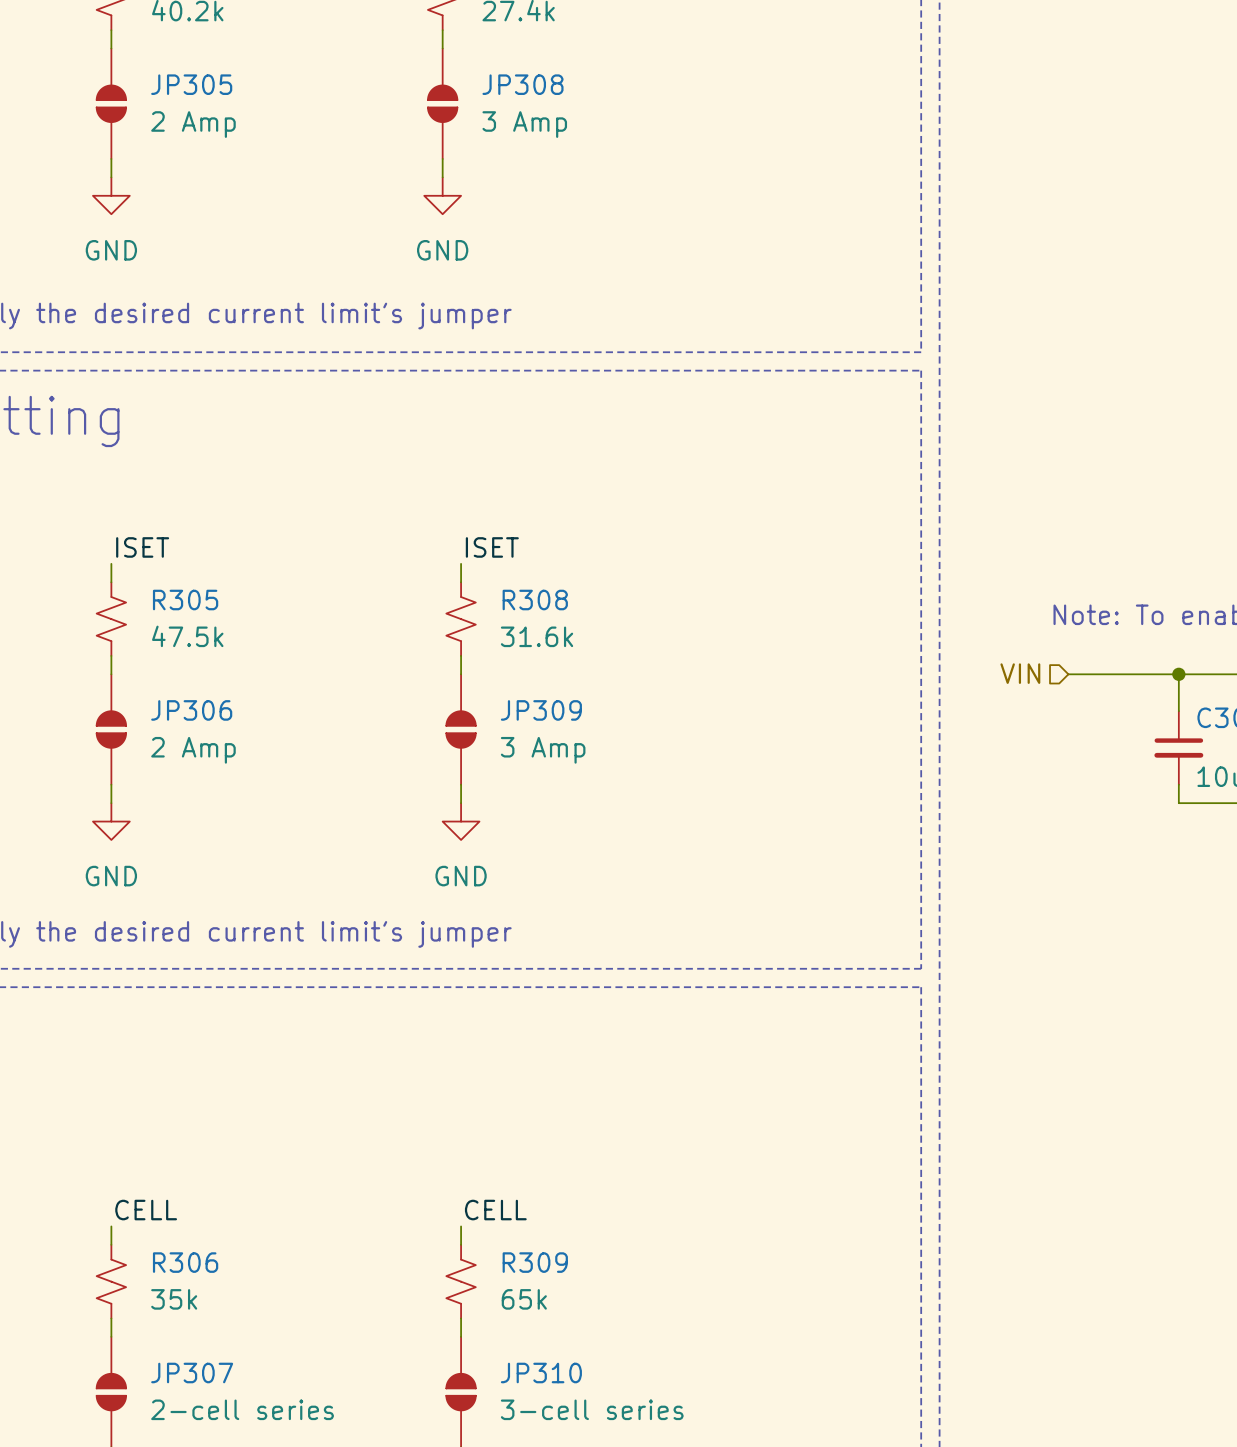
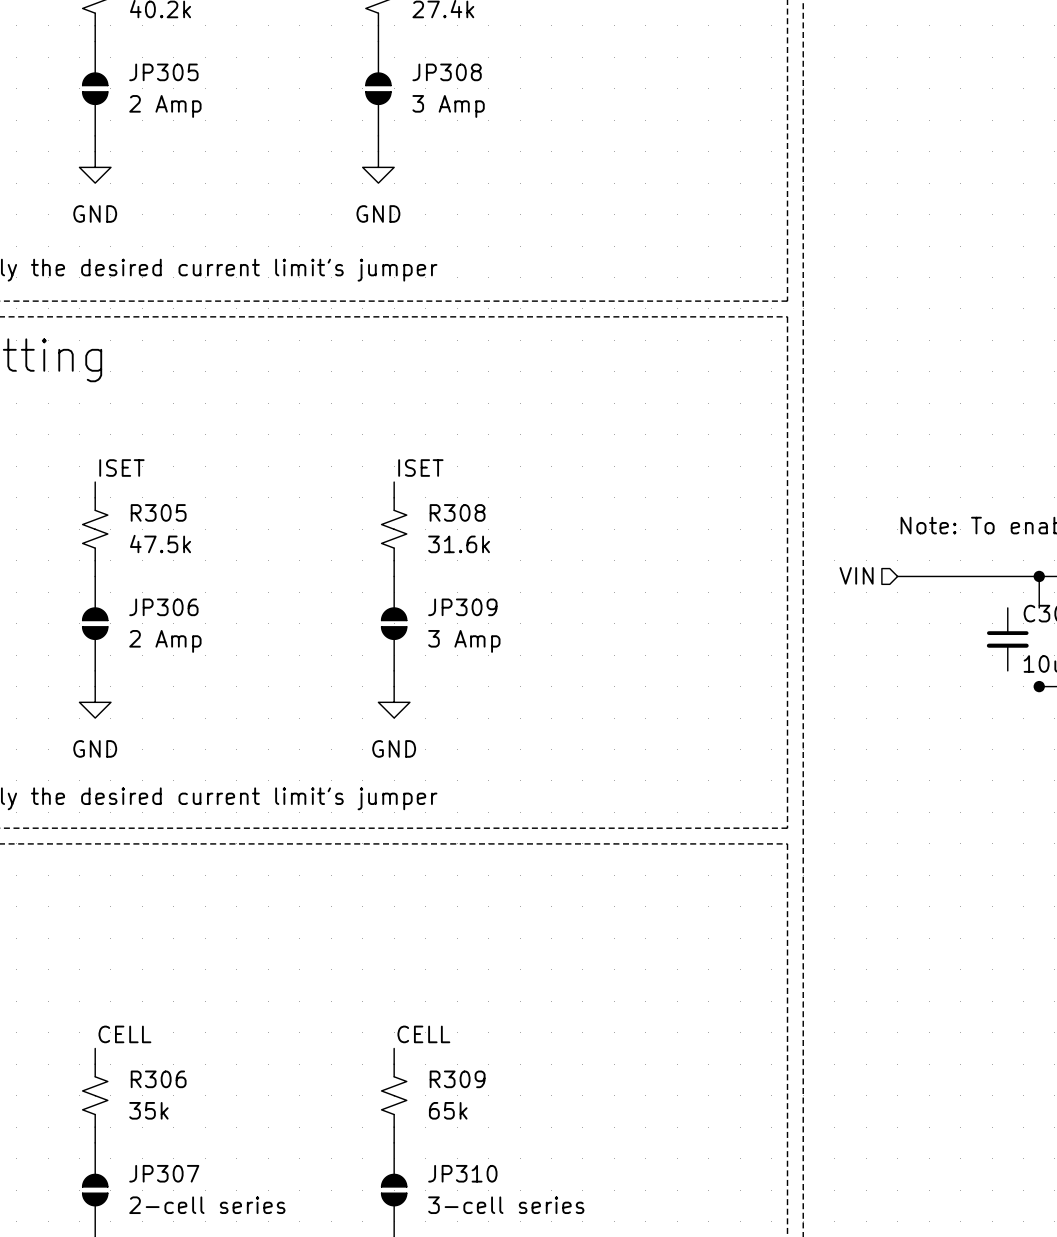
hierarchical label position: VIN (1020, 673) -> VIN (856, 575)
wire: none -> (897, 576) (913, 576)
wire: (1178, 674) (1178, 711) -> (1039, 576) (1039, 607)
junction position: (1178, 674) -> (1039, 576)
wire: (1178, 784) (1178, 803) (1215, 803) -> none
junction: none -> (1039, 686)

